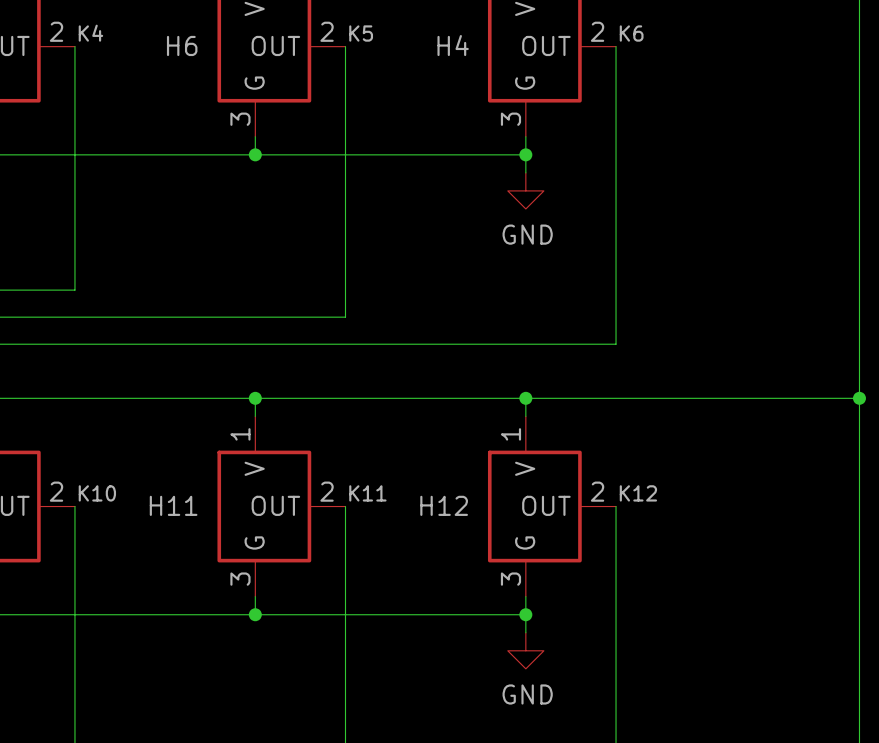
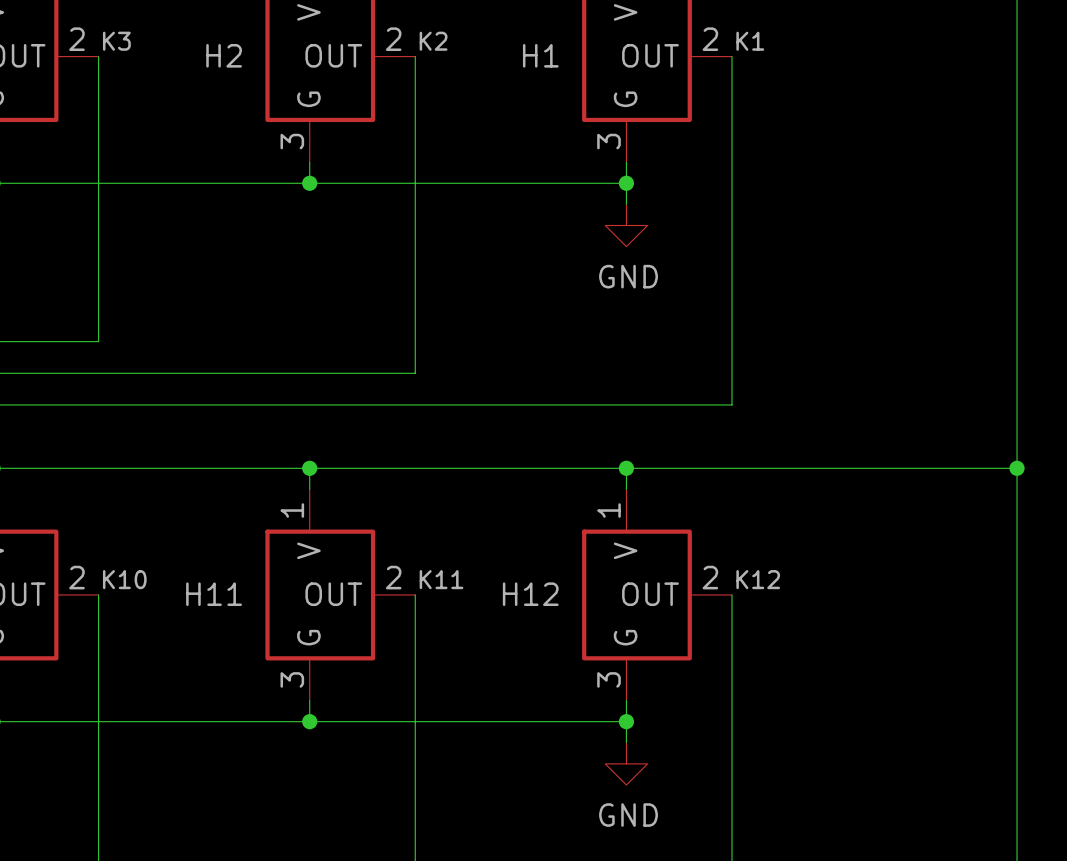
label: K4 (90, 33) -> K3 (116, 41)
label: K5 (361, 33) -> K2 (433, 41)
label: K6 (631, 33) -> K1 (750, 41)
H6 name: H6 (182, 45) -> H2 (224, 55)
H4 name: H4 (453, 45) -> H1 (540, 55)

